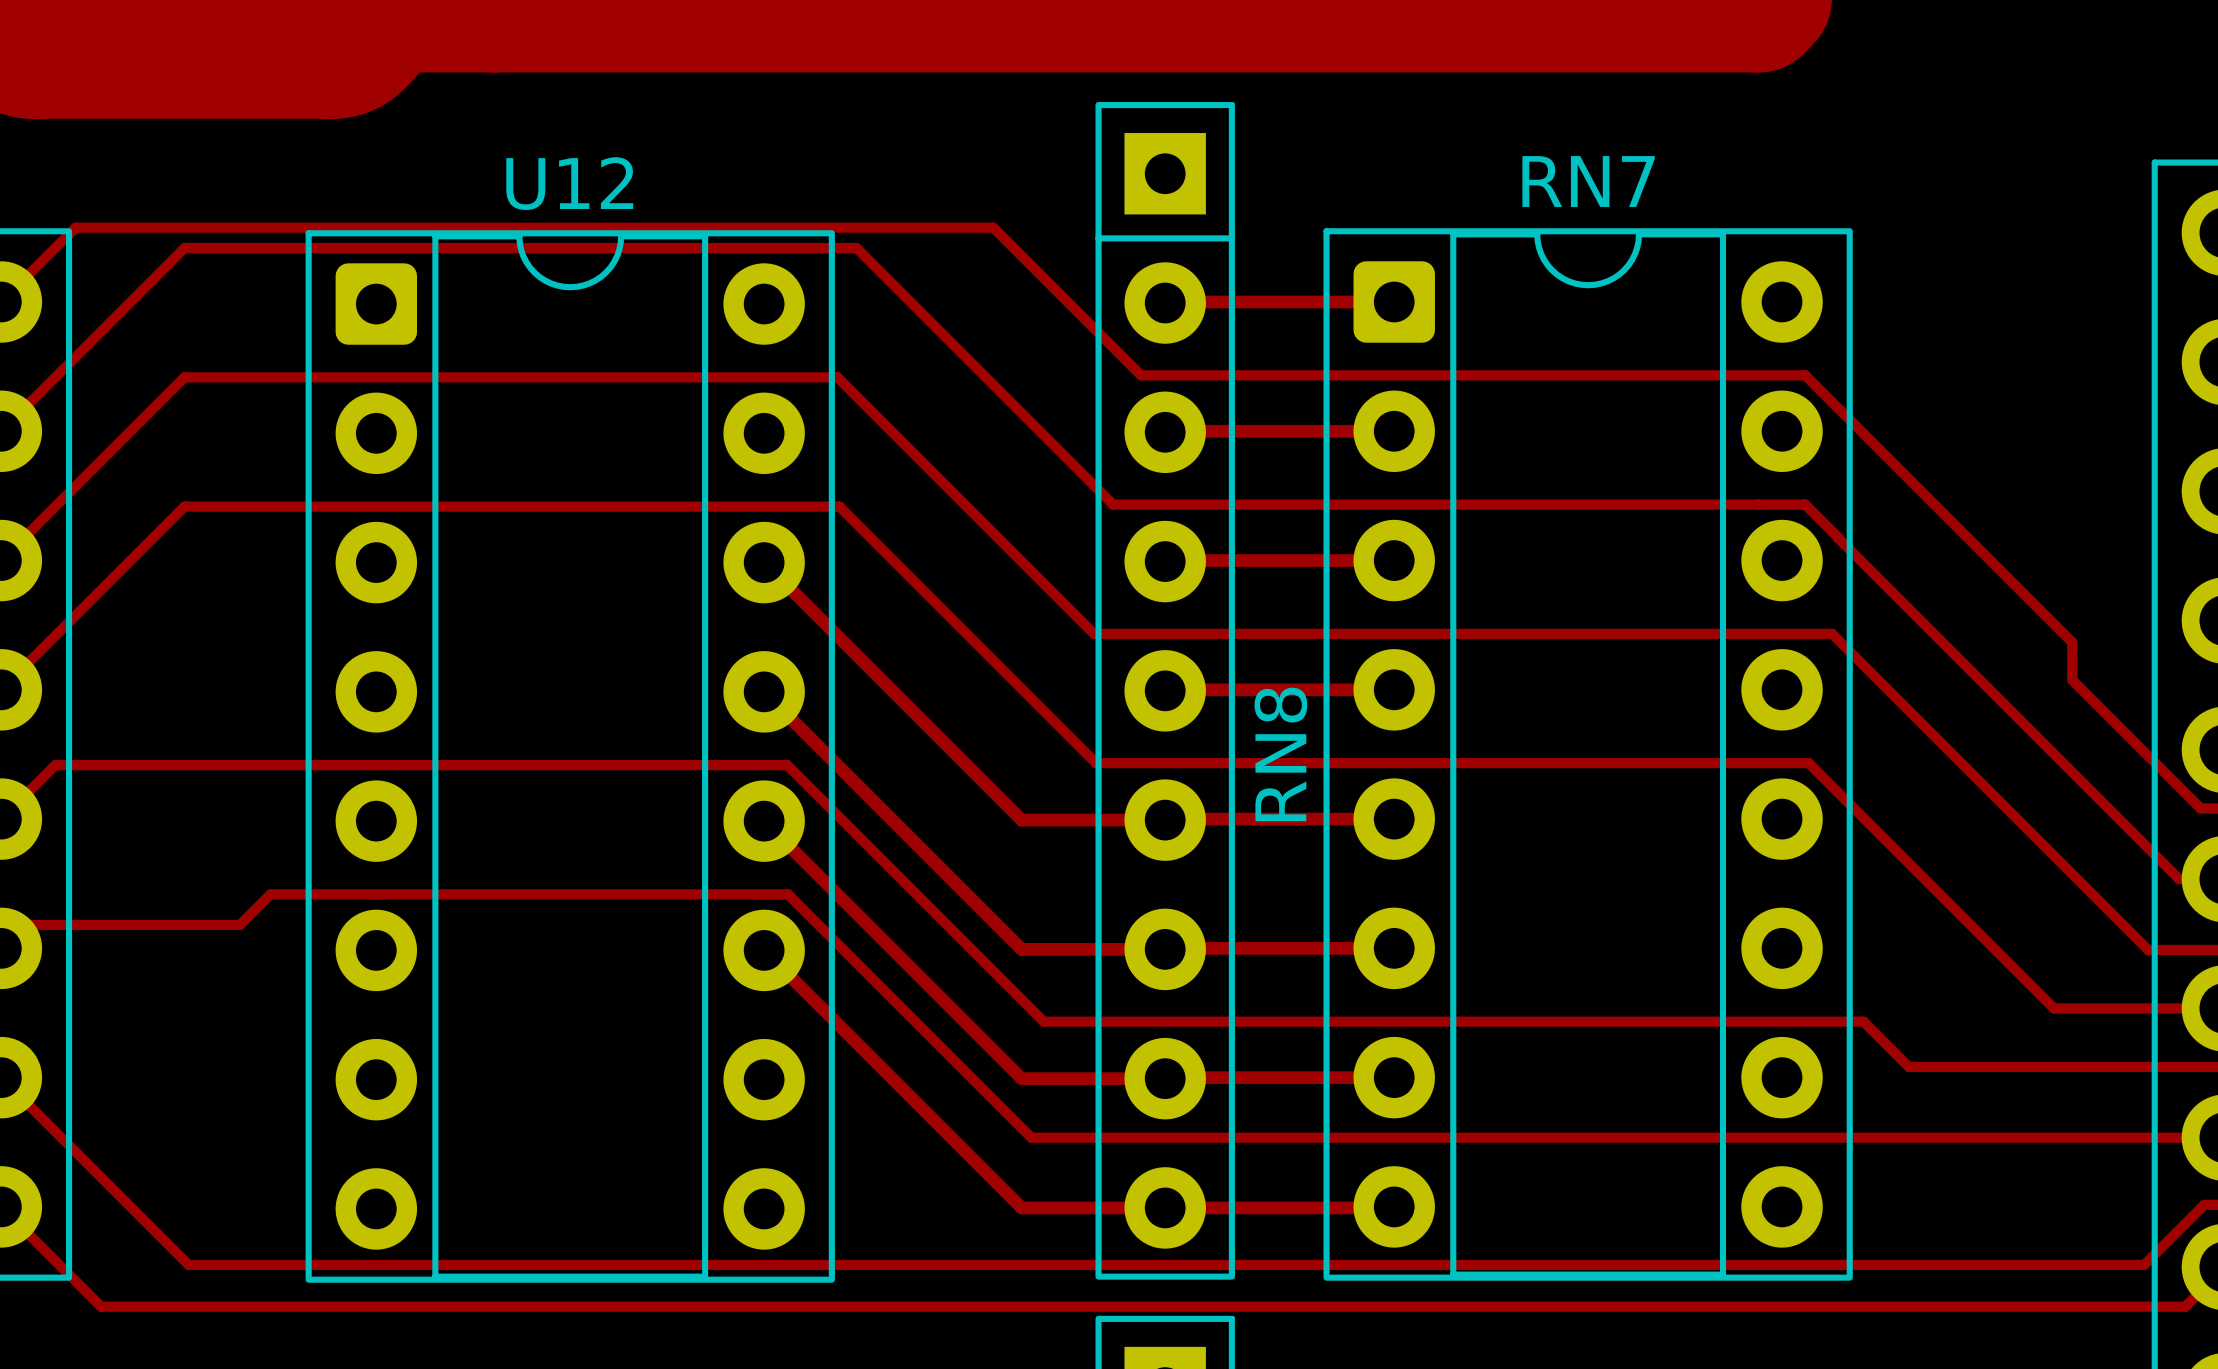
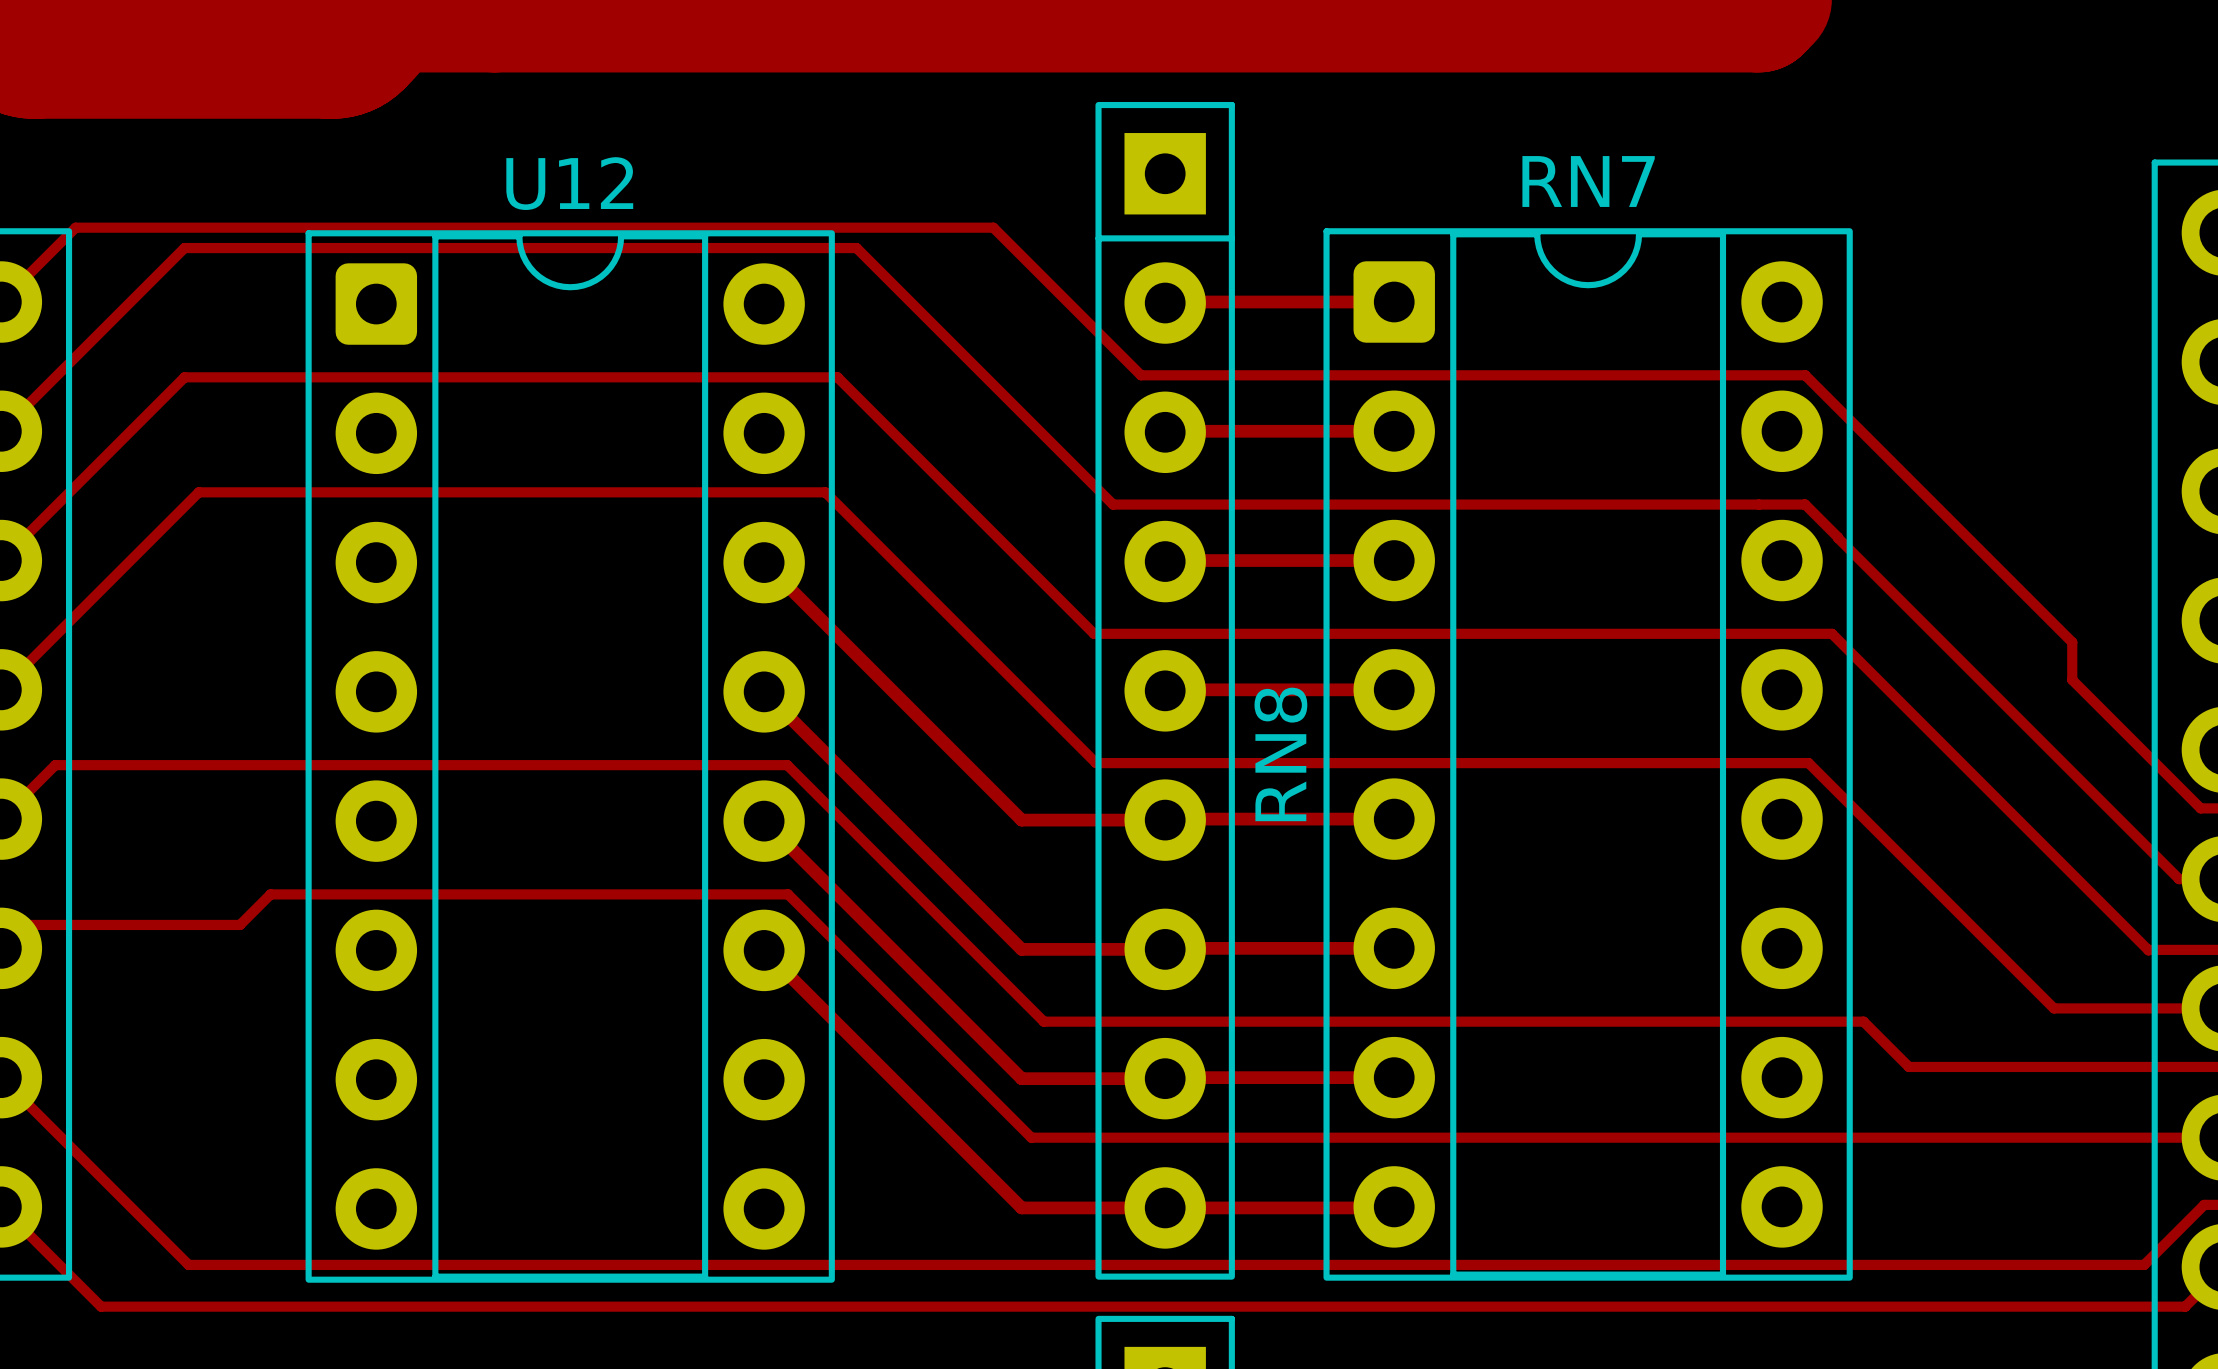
track: (184, 506) (839, 506) -> (184, 506) (198, 492) (825, 492) (839, 506)

